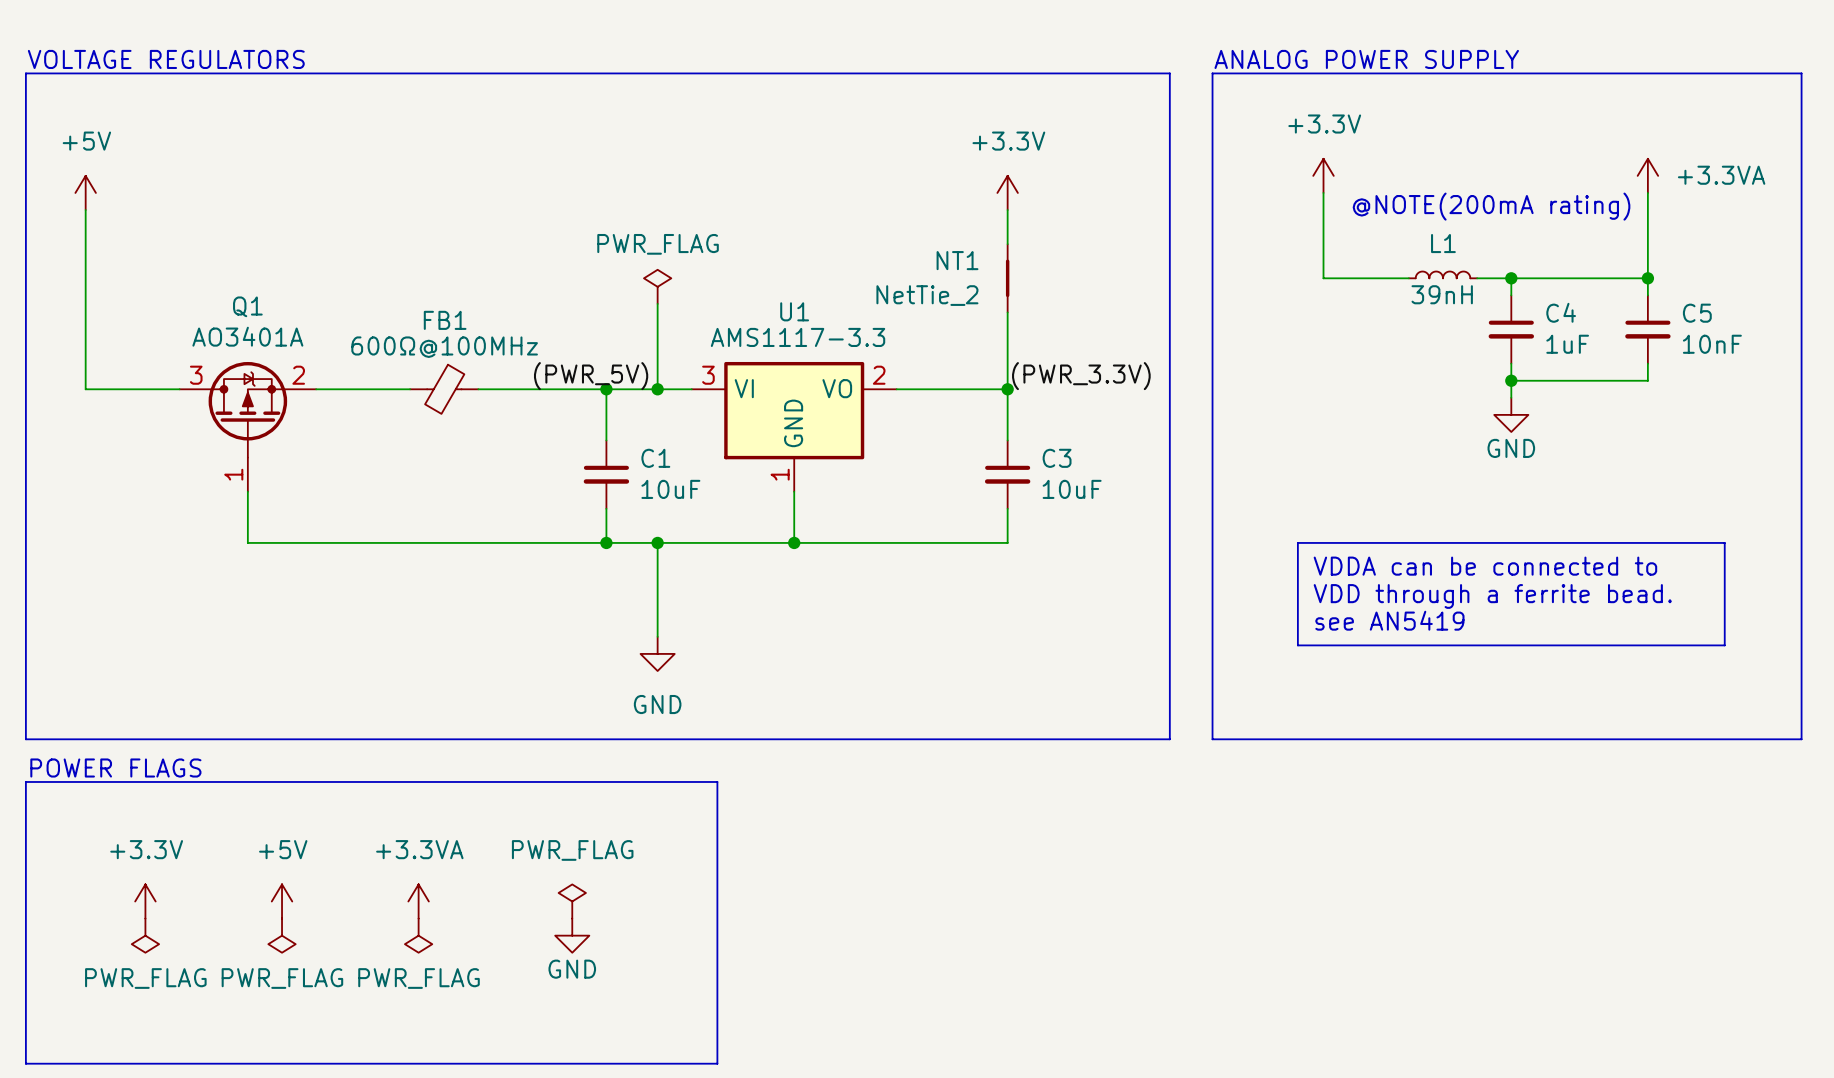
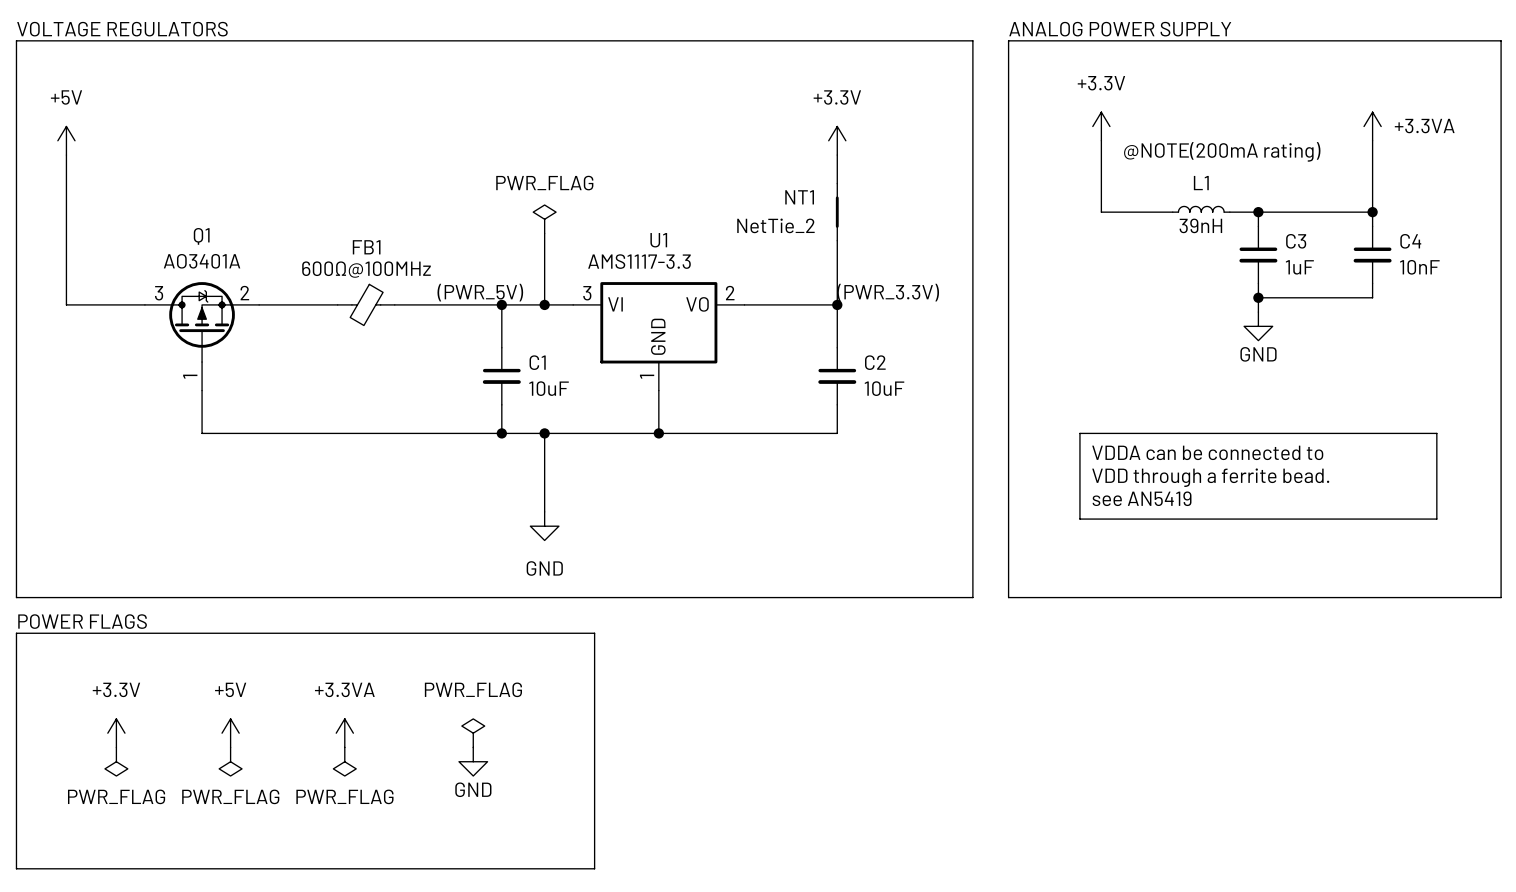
C4 name: C4 (1561, 312) -> C3 (1296, 241)
C5 name: C5 (1697, 313) -> C4 (1410, 241)
C3 name: C3 (1057, 458) -> C2 (875, 362)

